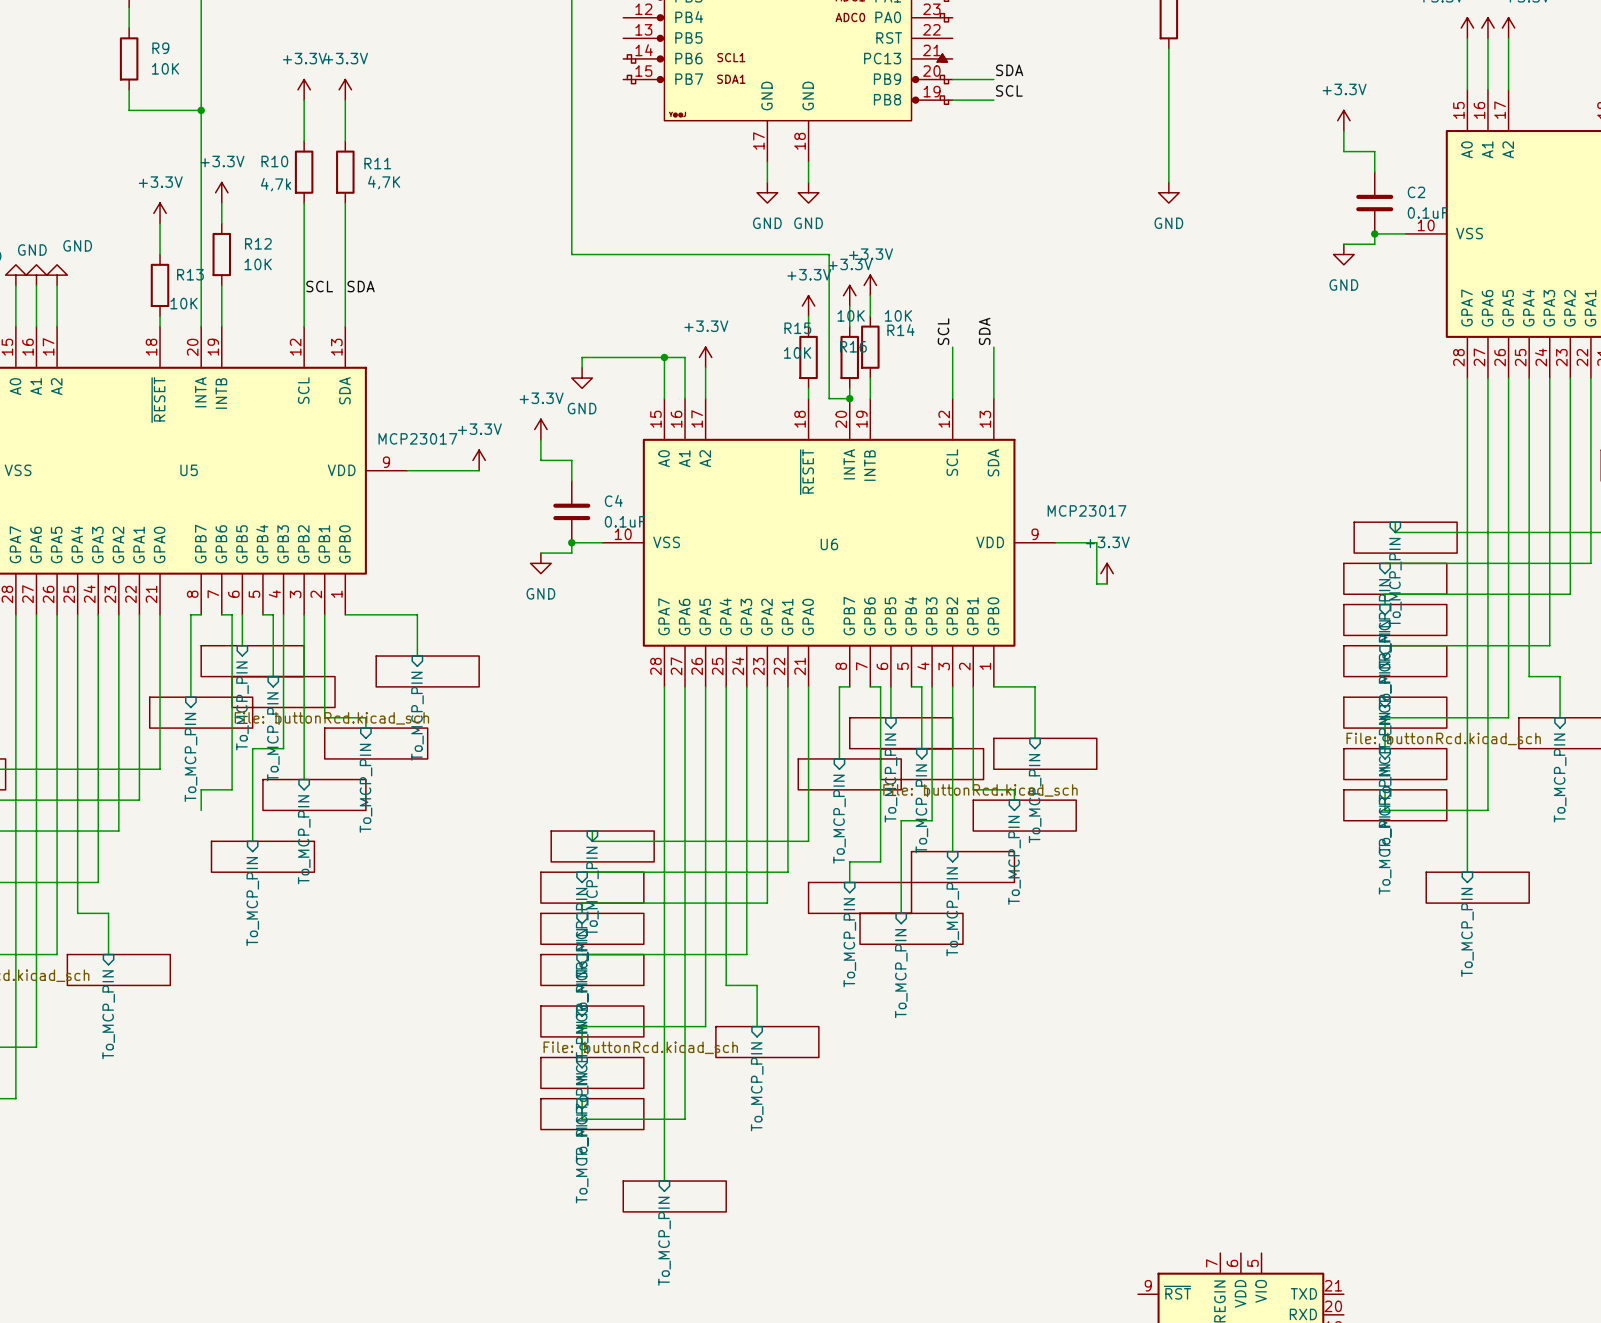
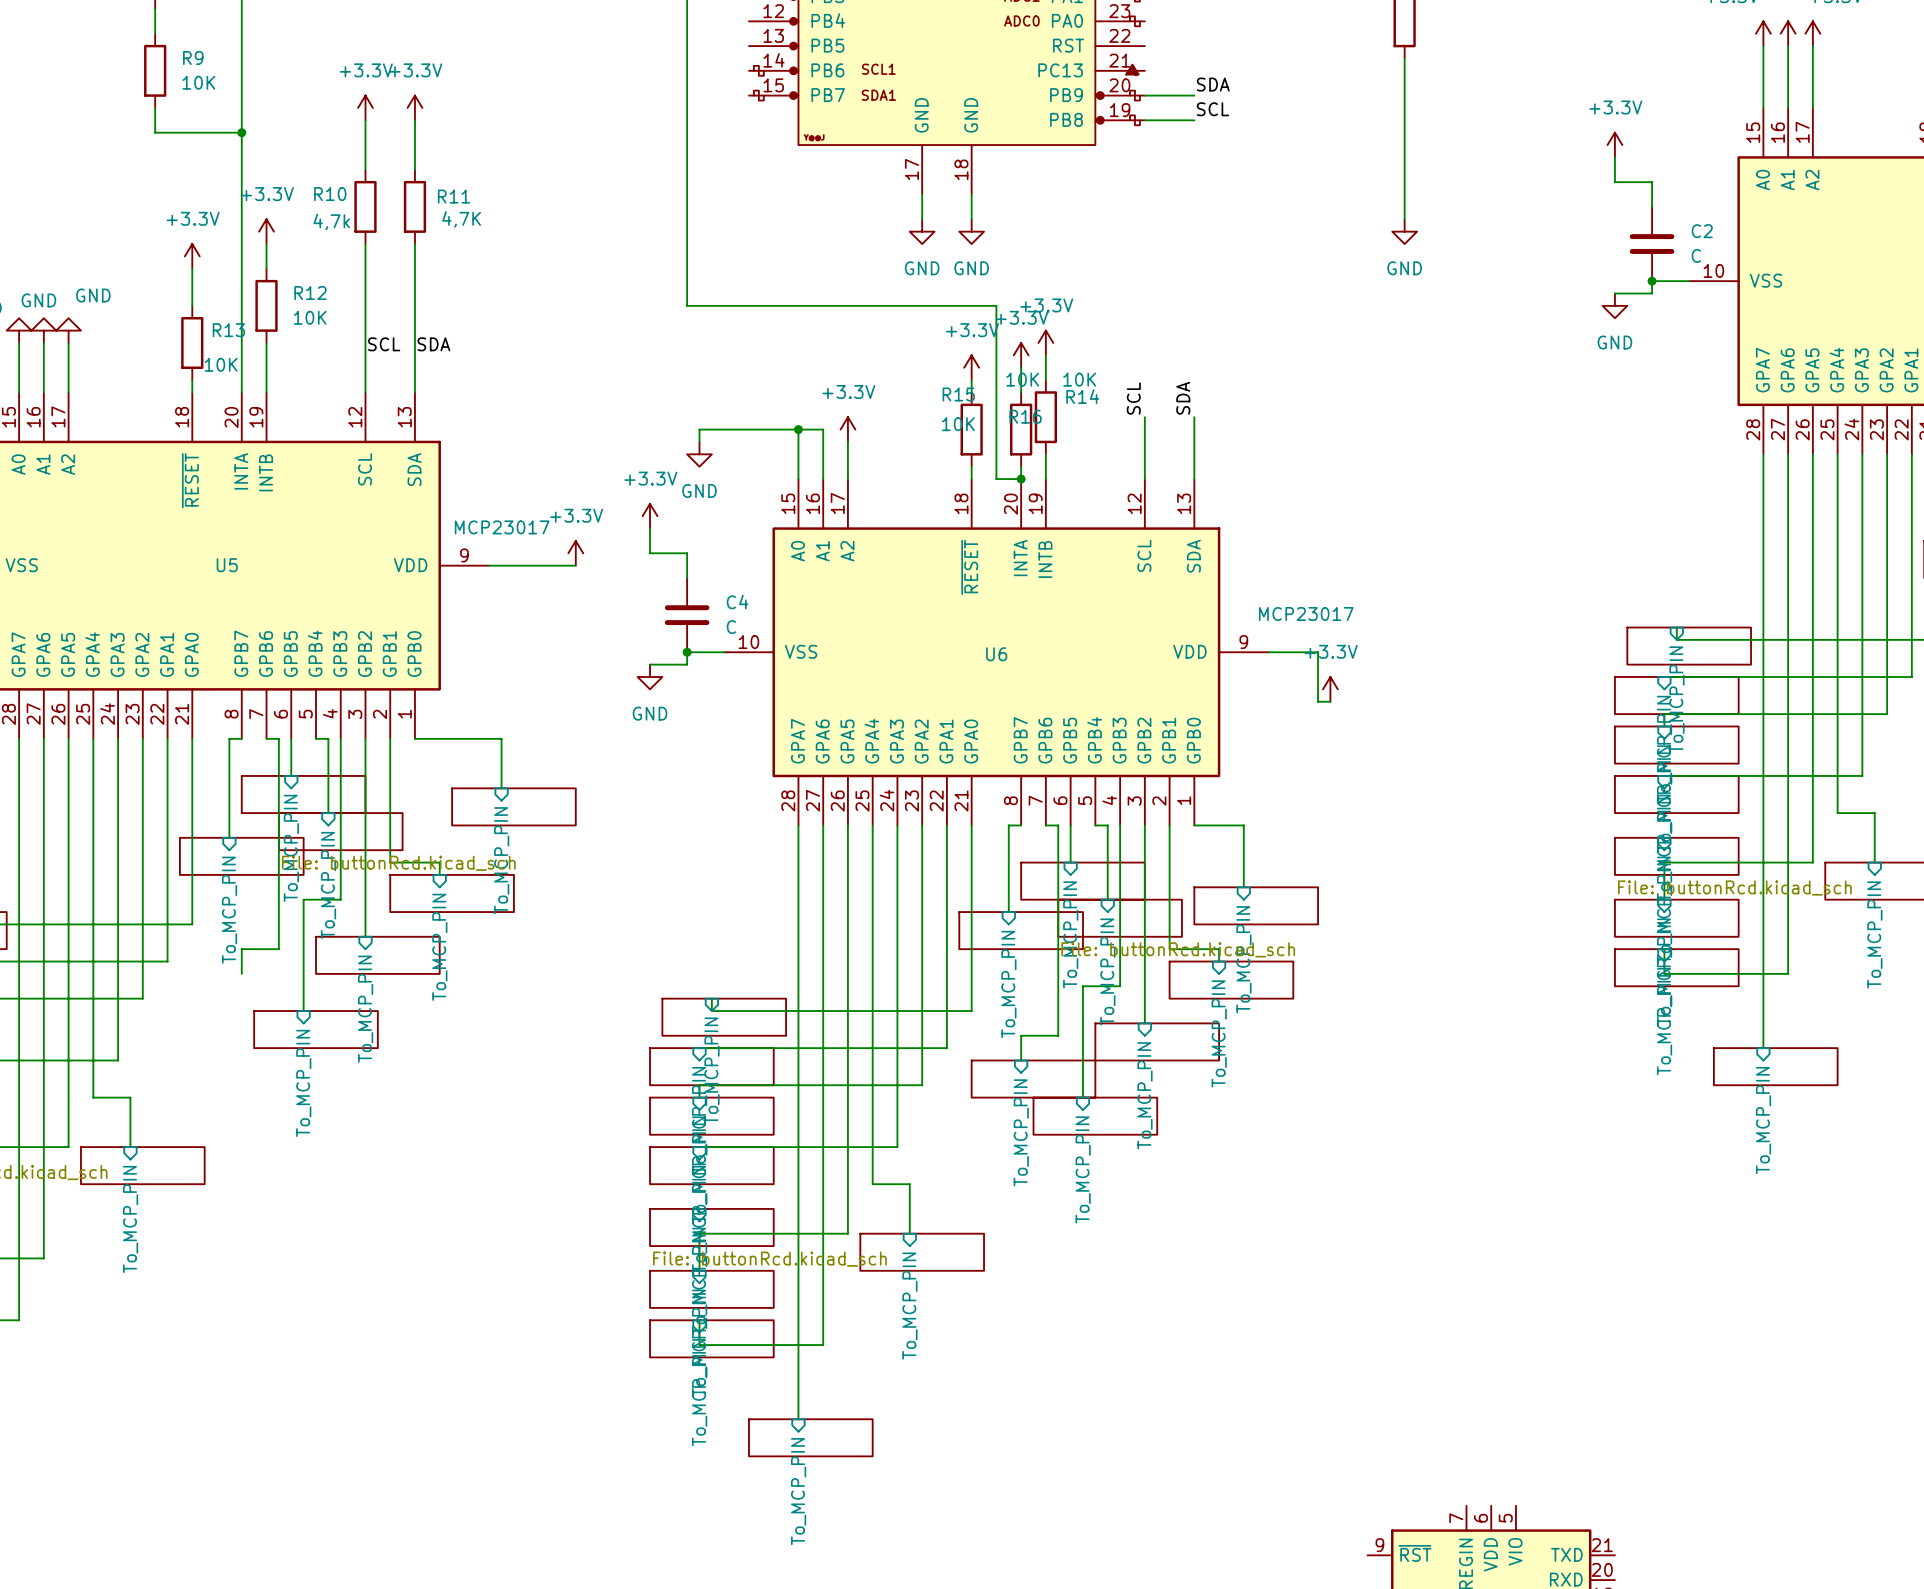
C2 value: 0.1uF (1428, 212) -> C (1696, 255)
C4 value: 0.1uF (625, 521) -> C (731, 627)

